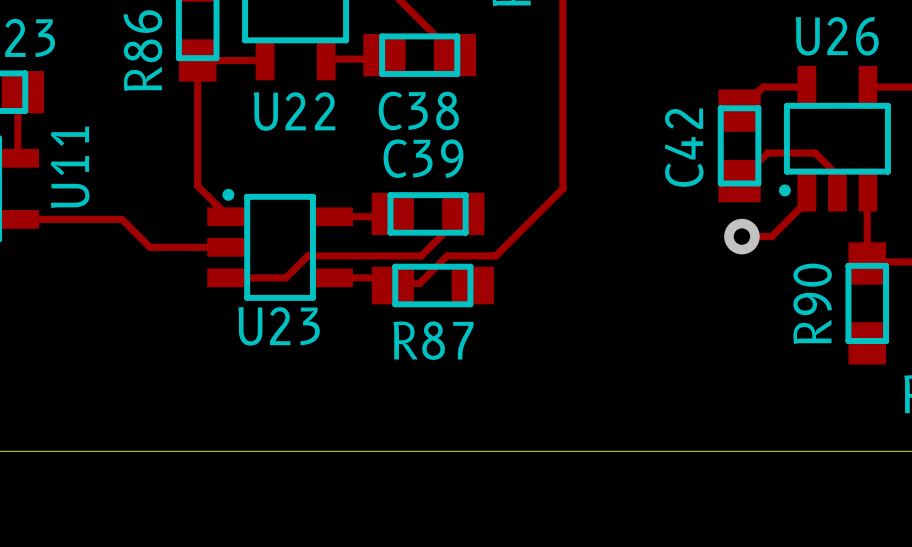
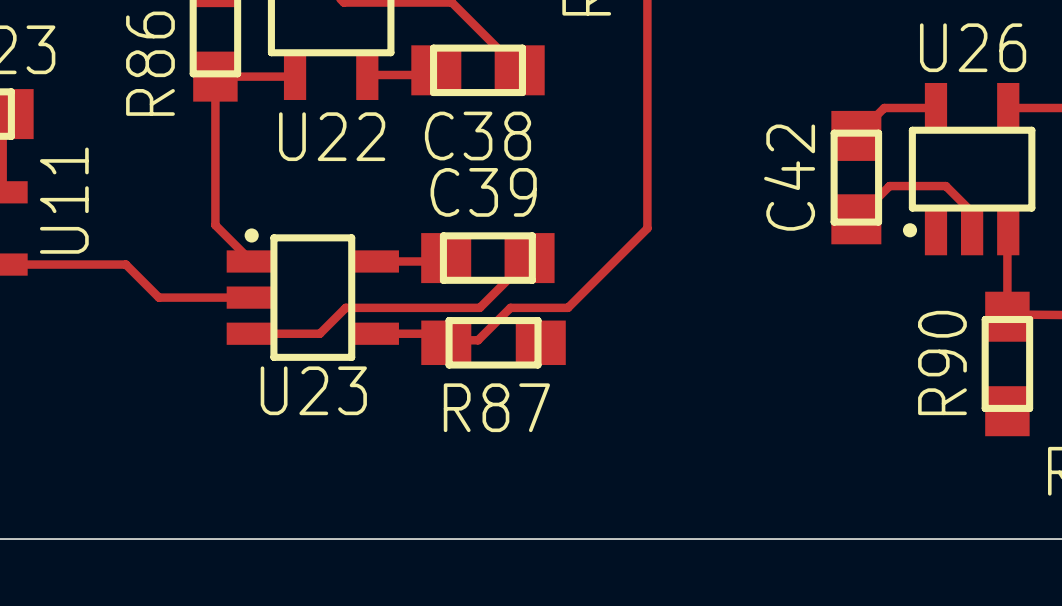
track: (806, 190) (806, 201) (771, 236) (741, 236) -> none
via: (741, 236) -> none

